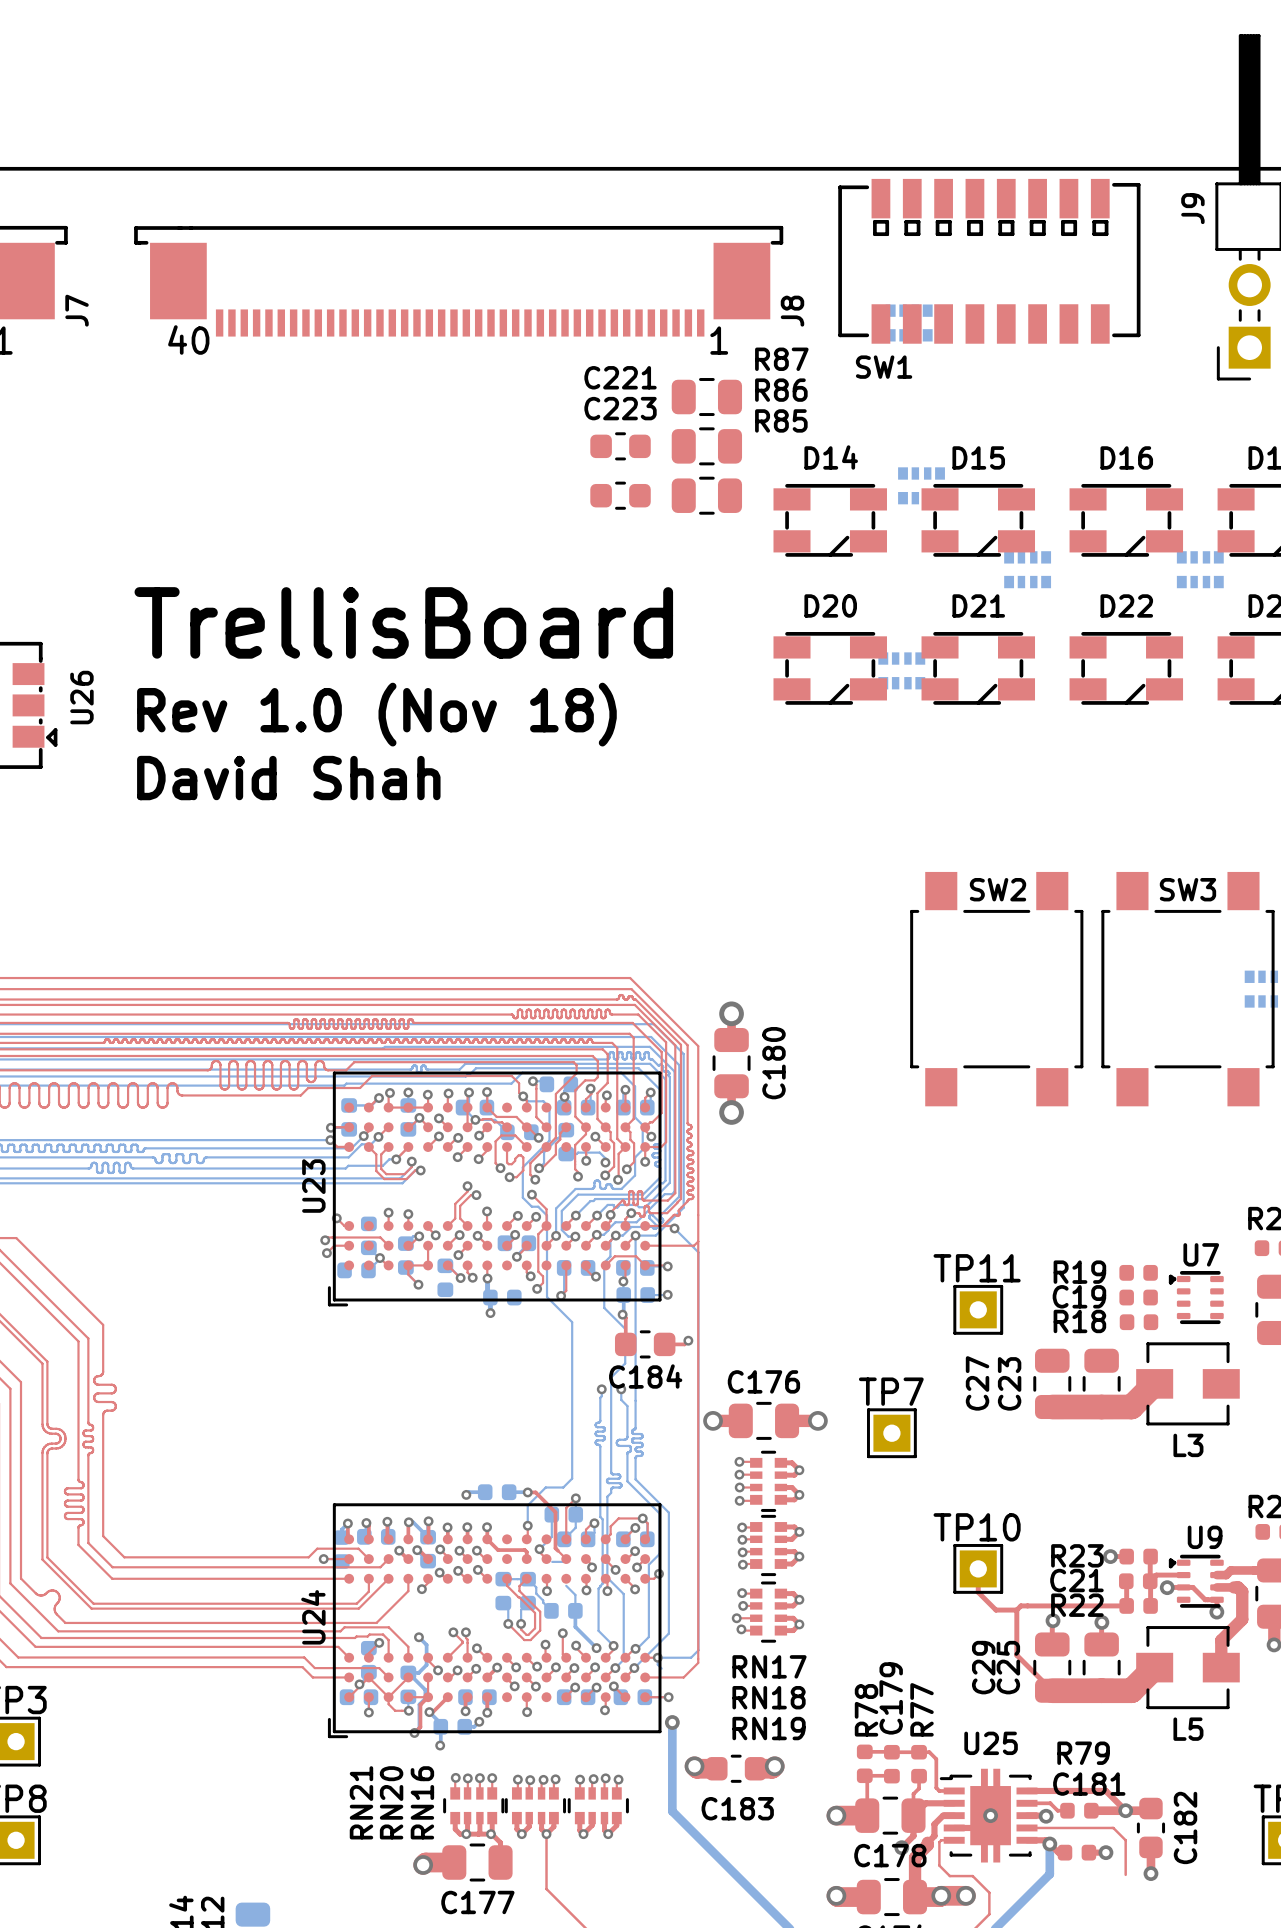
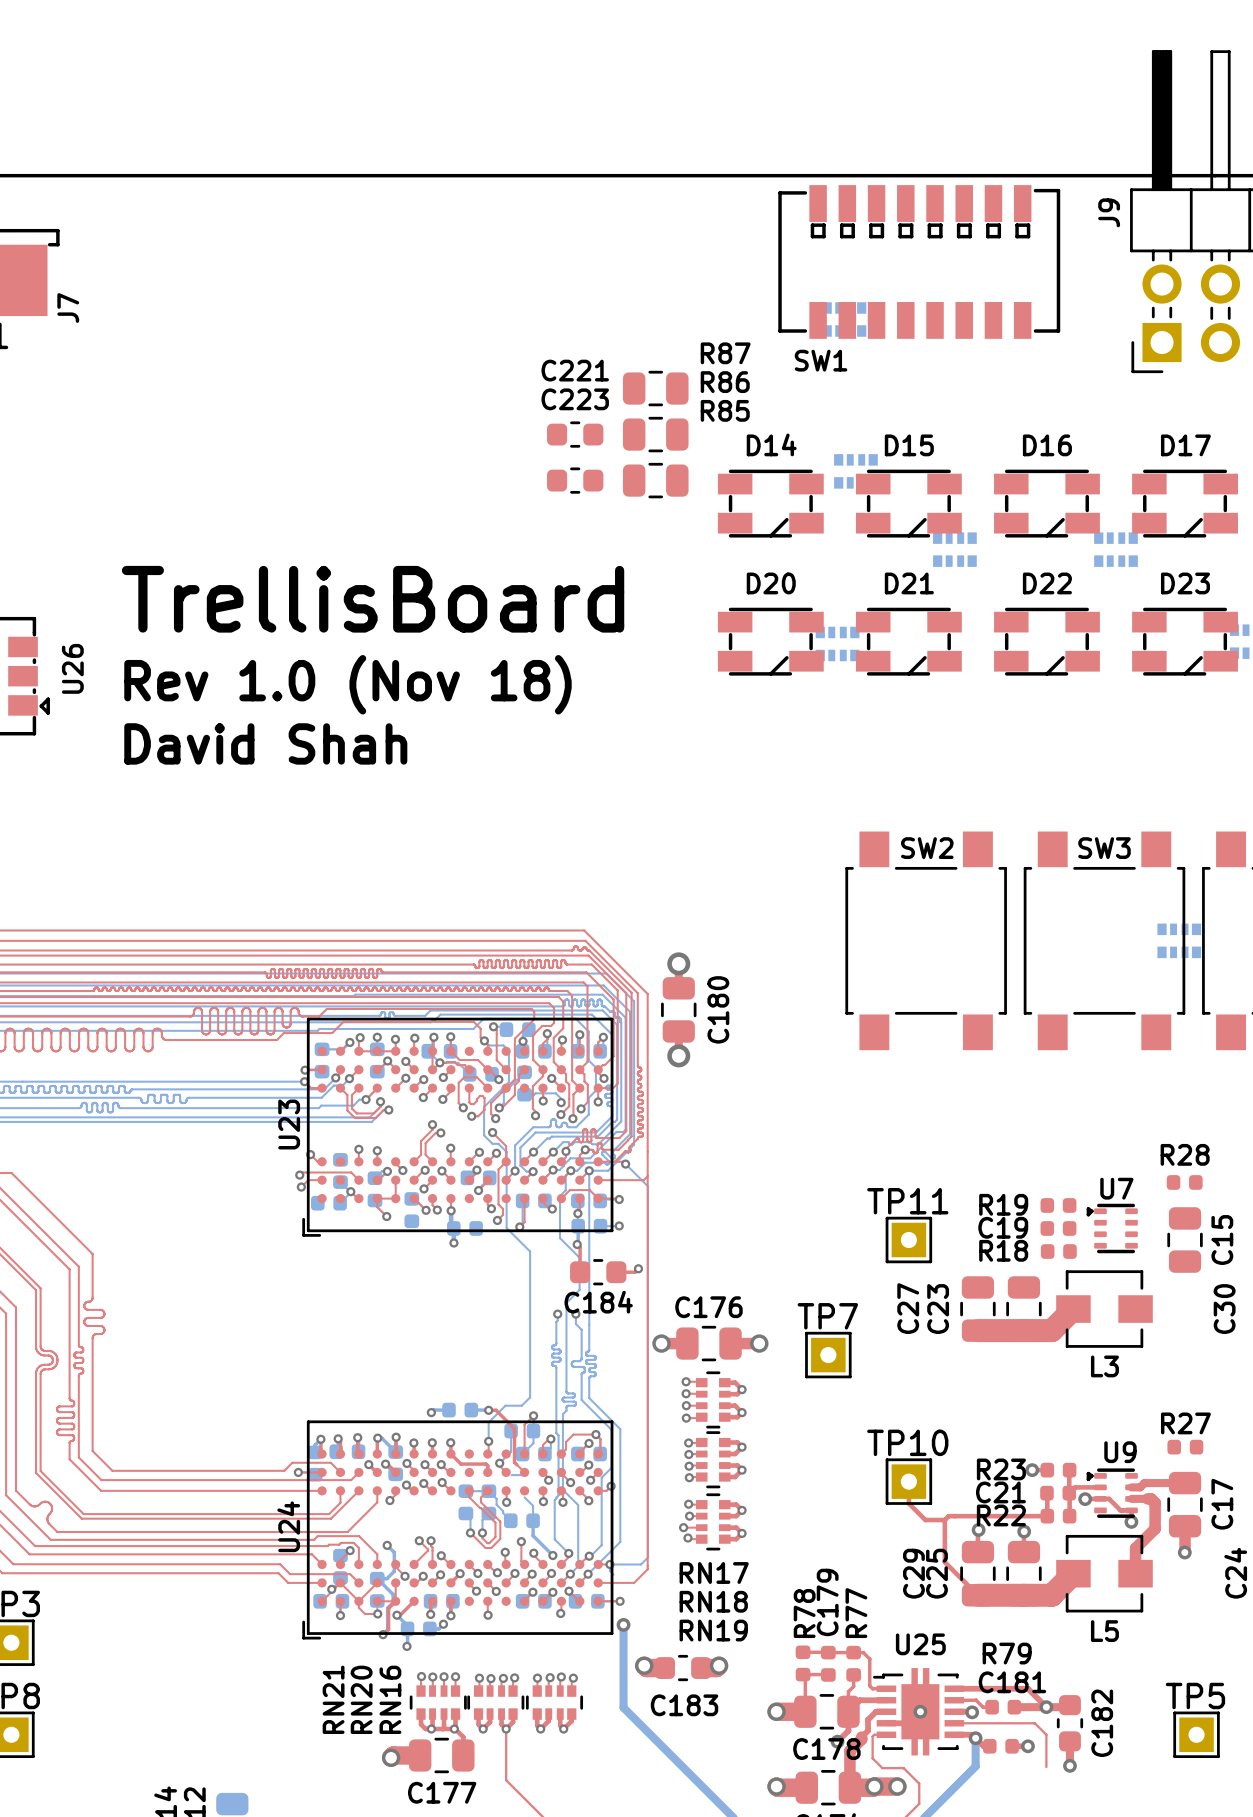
J8: (458, 281) -> none

